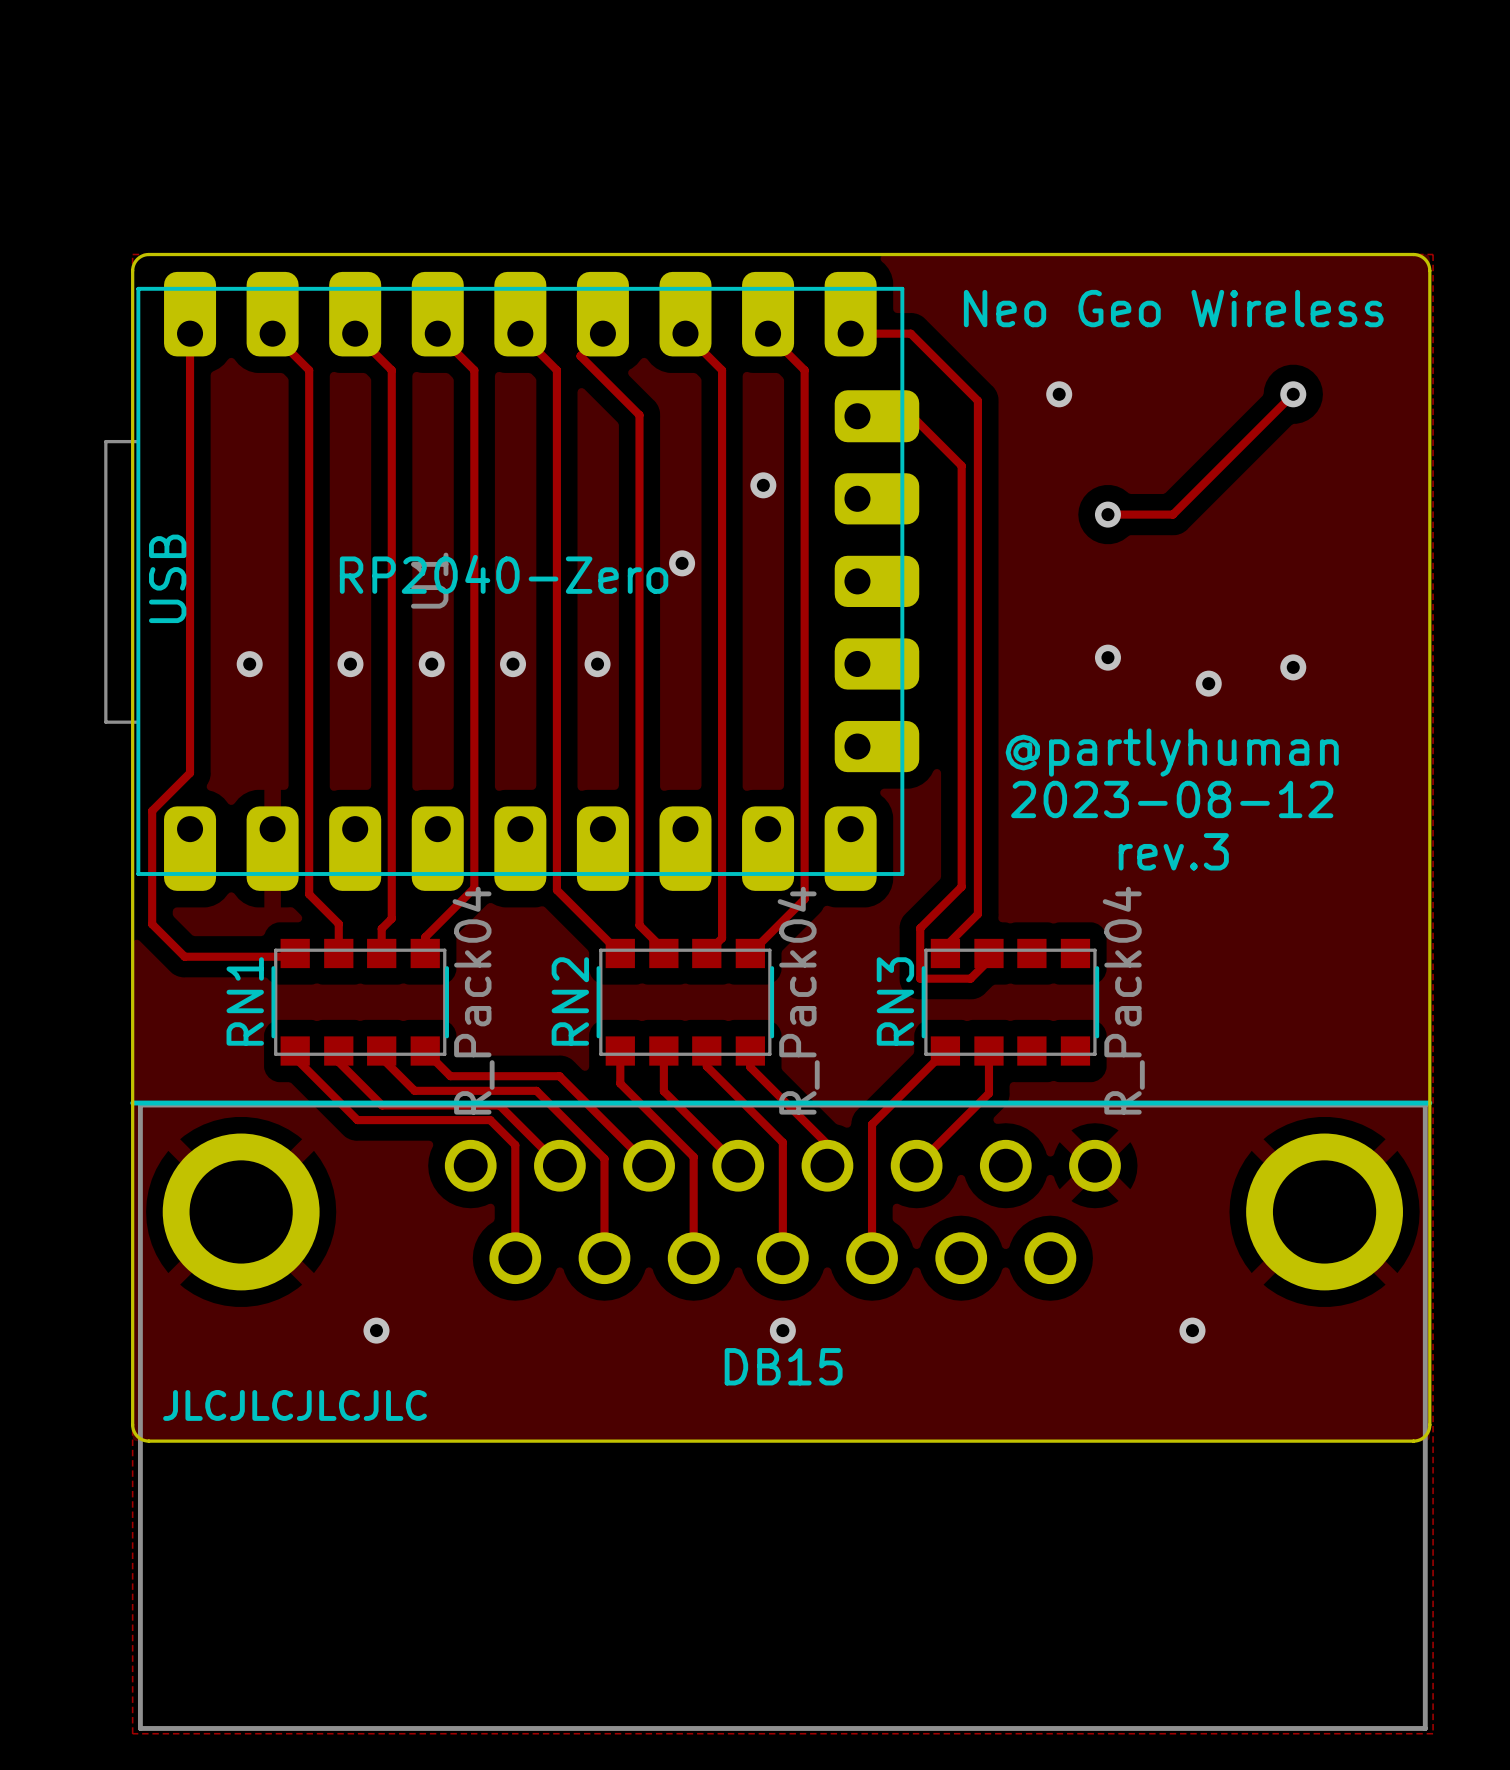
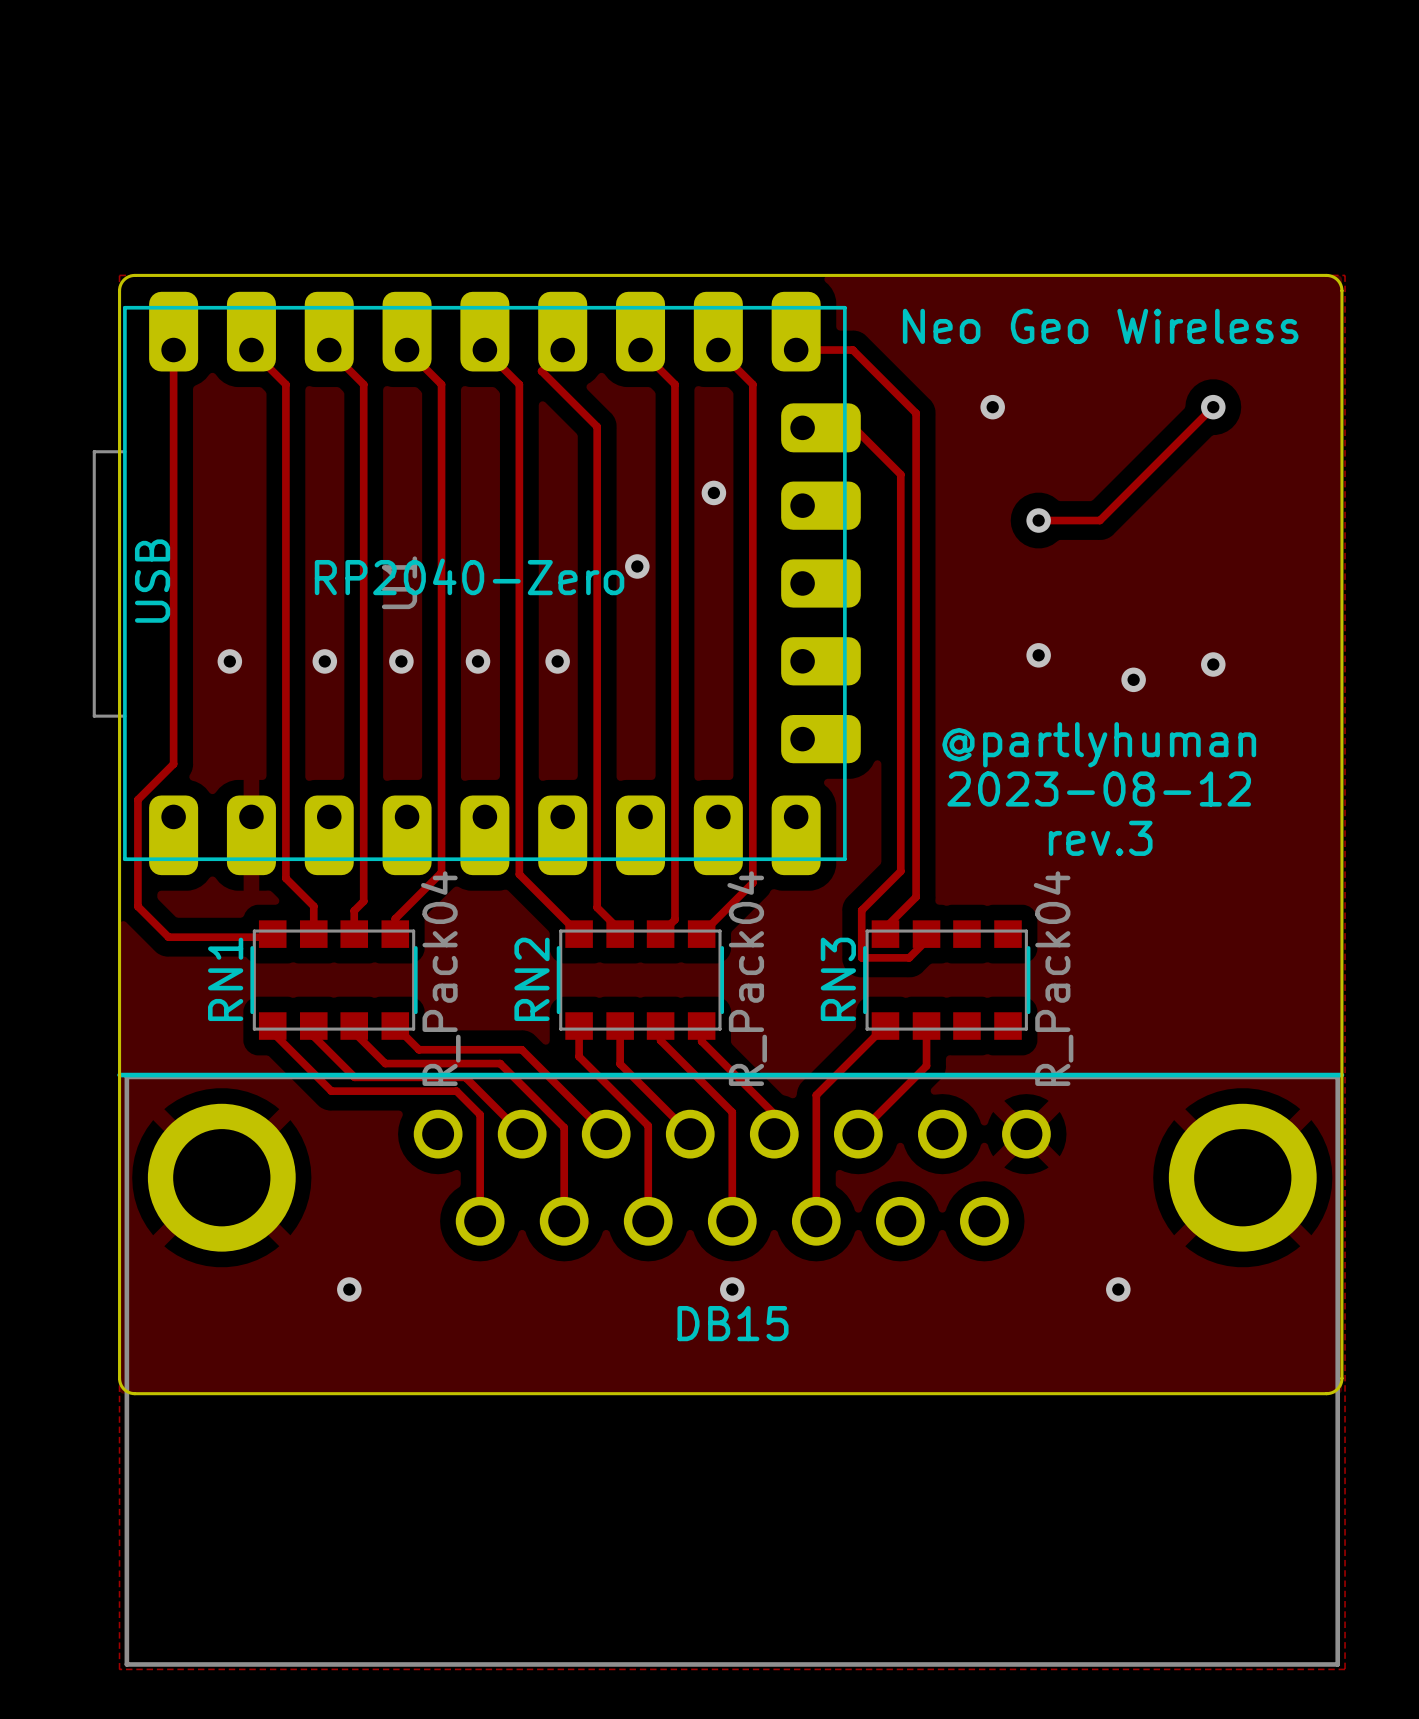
text: JLCJLCJLCJLC (295, 1405) -> none

